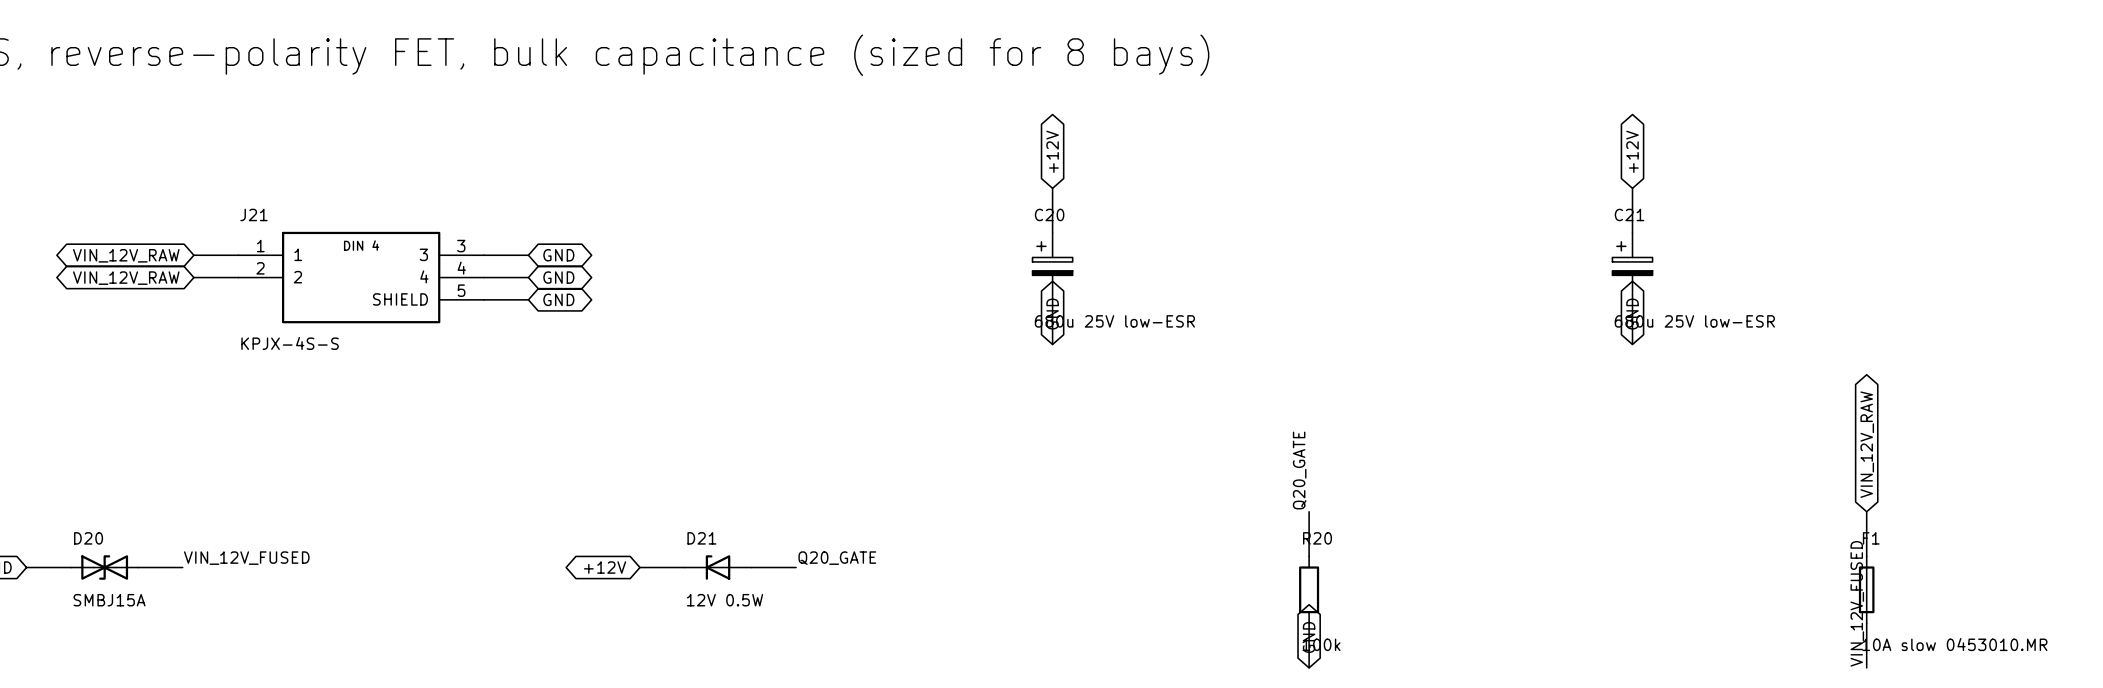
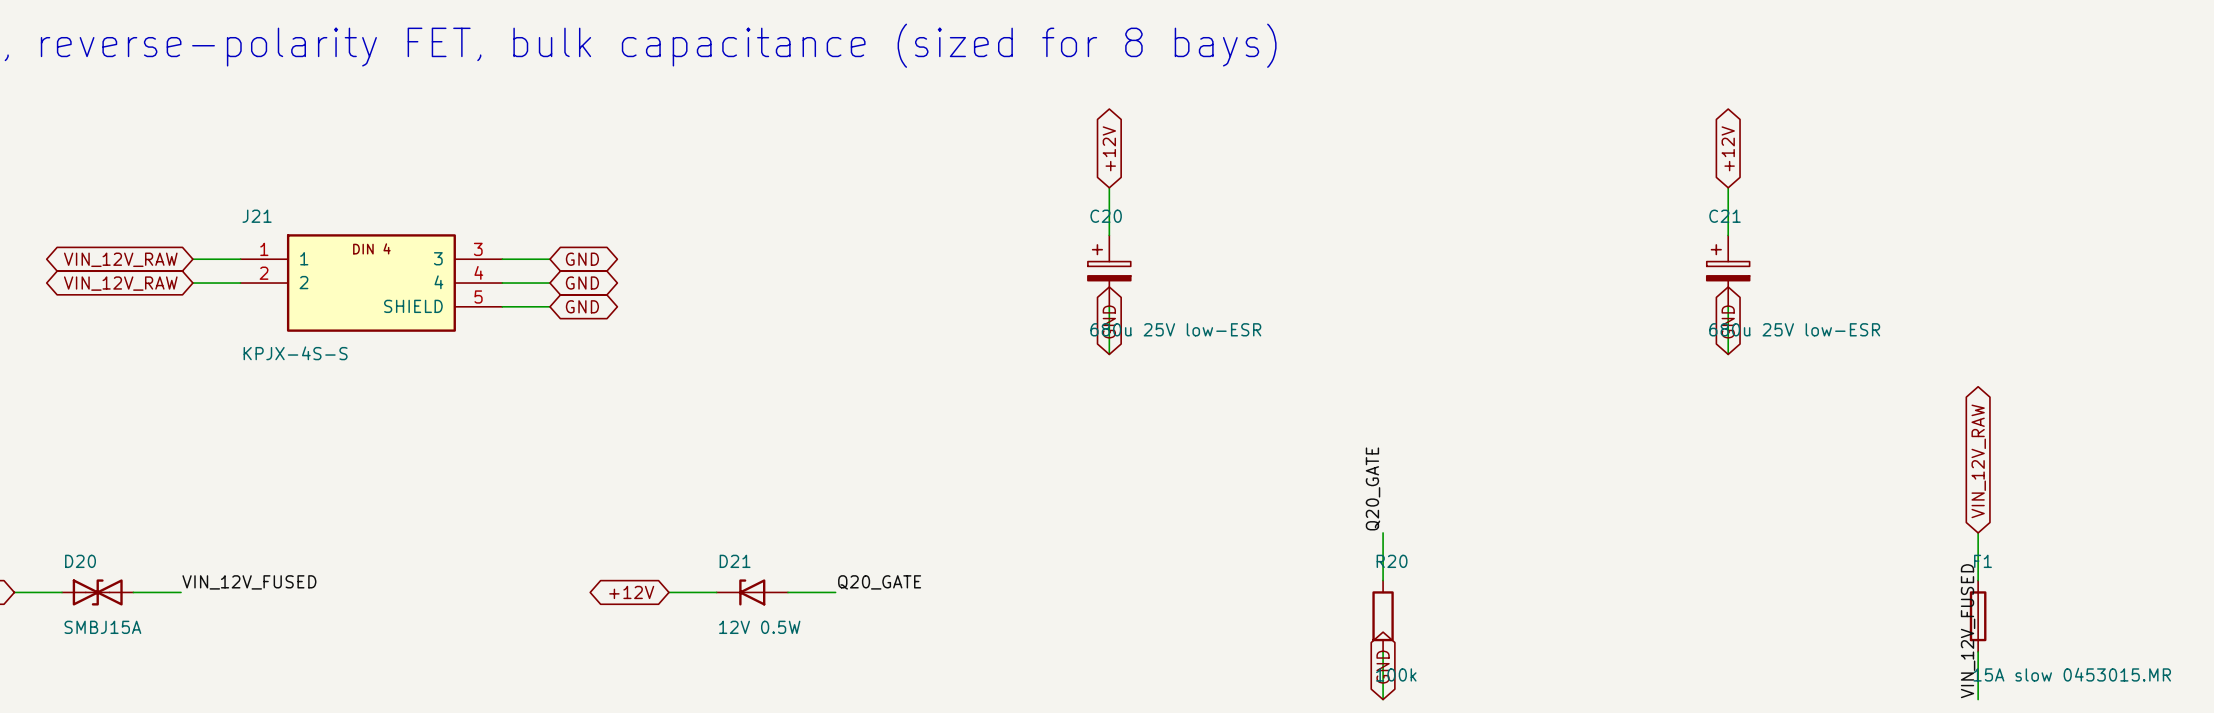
F1 value: 10A slow 0453010.MR (1954, 644) -> 15A slow 0453015.MR (2072, 674)

